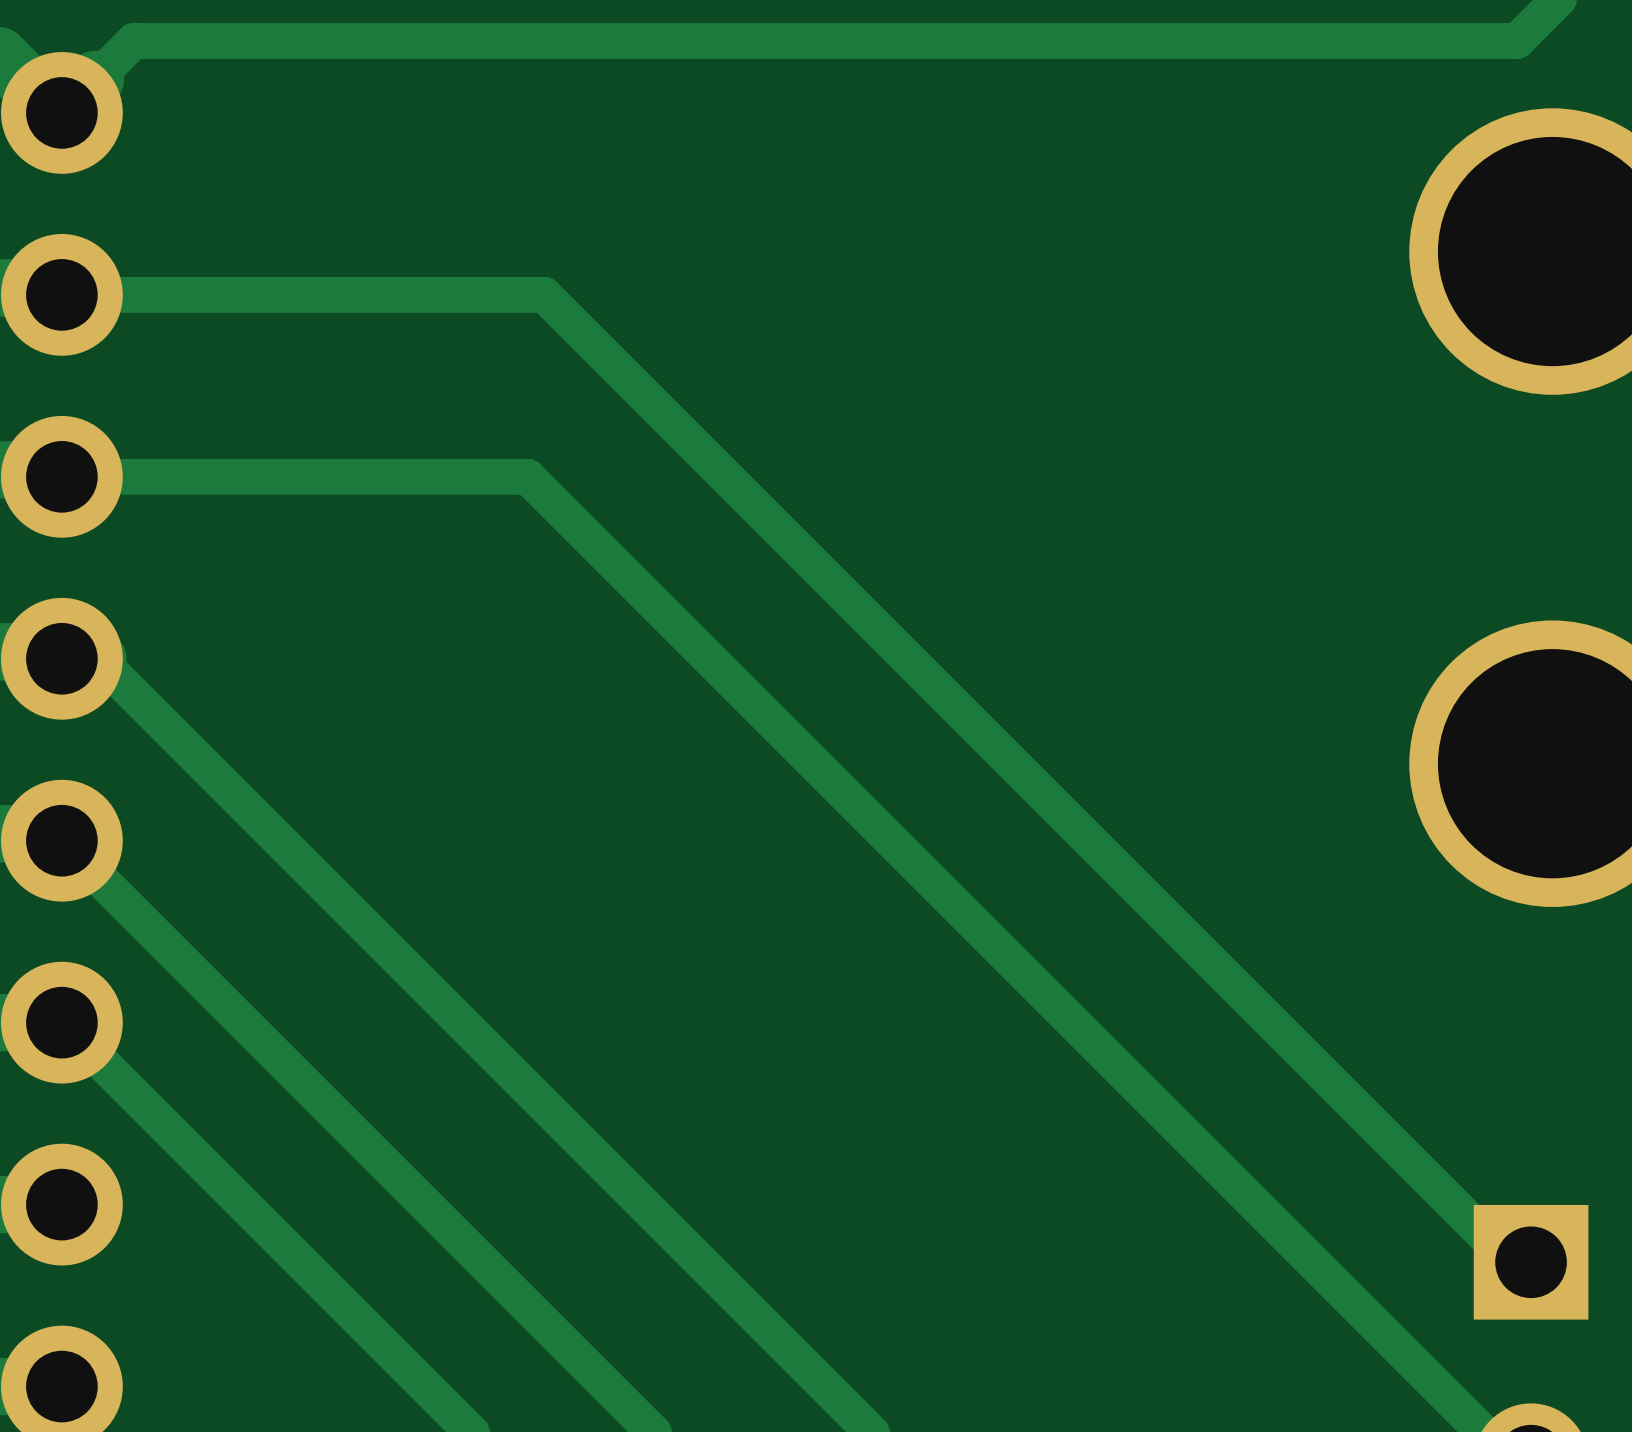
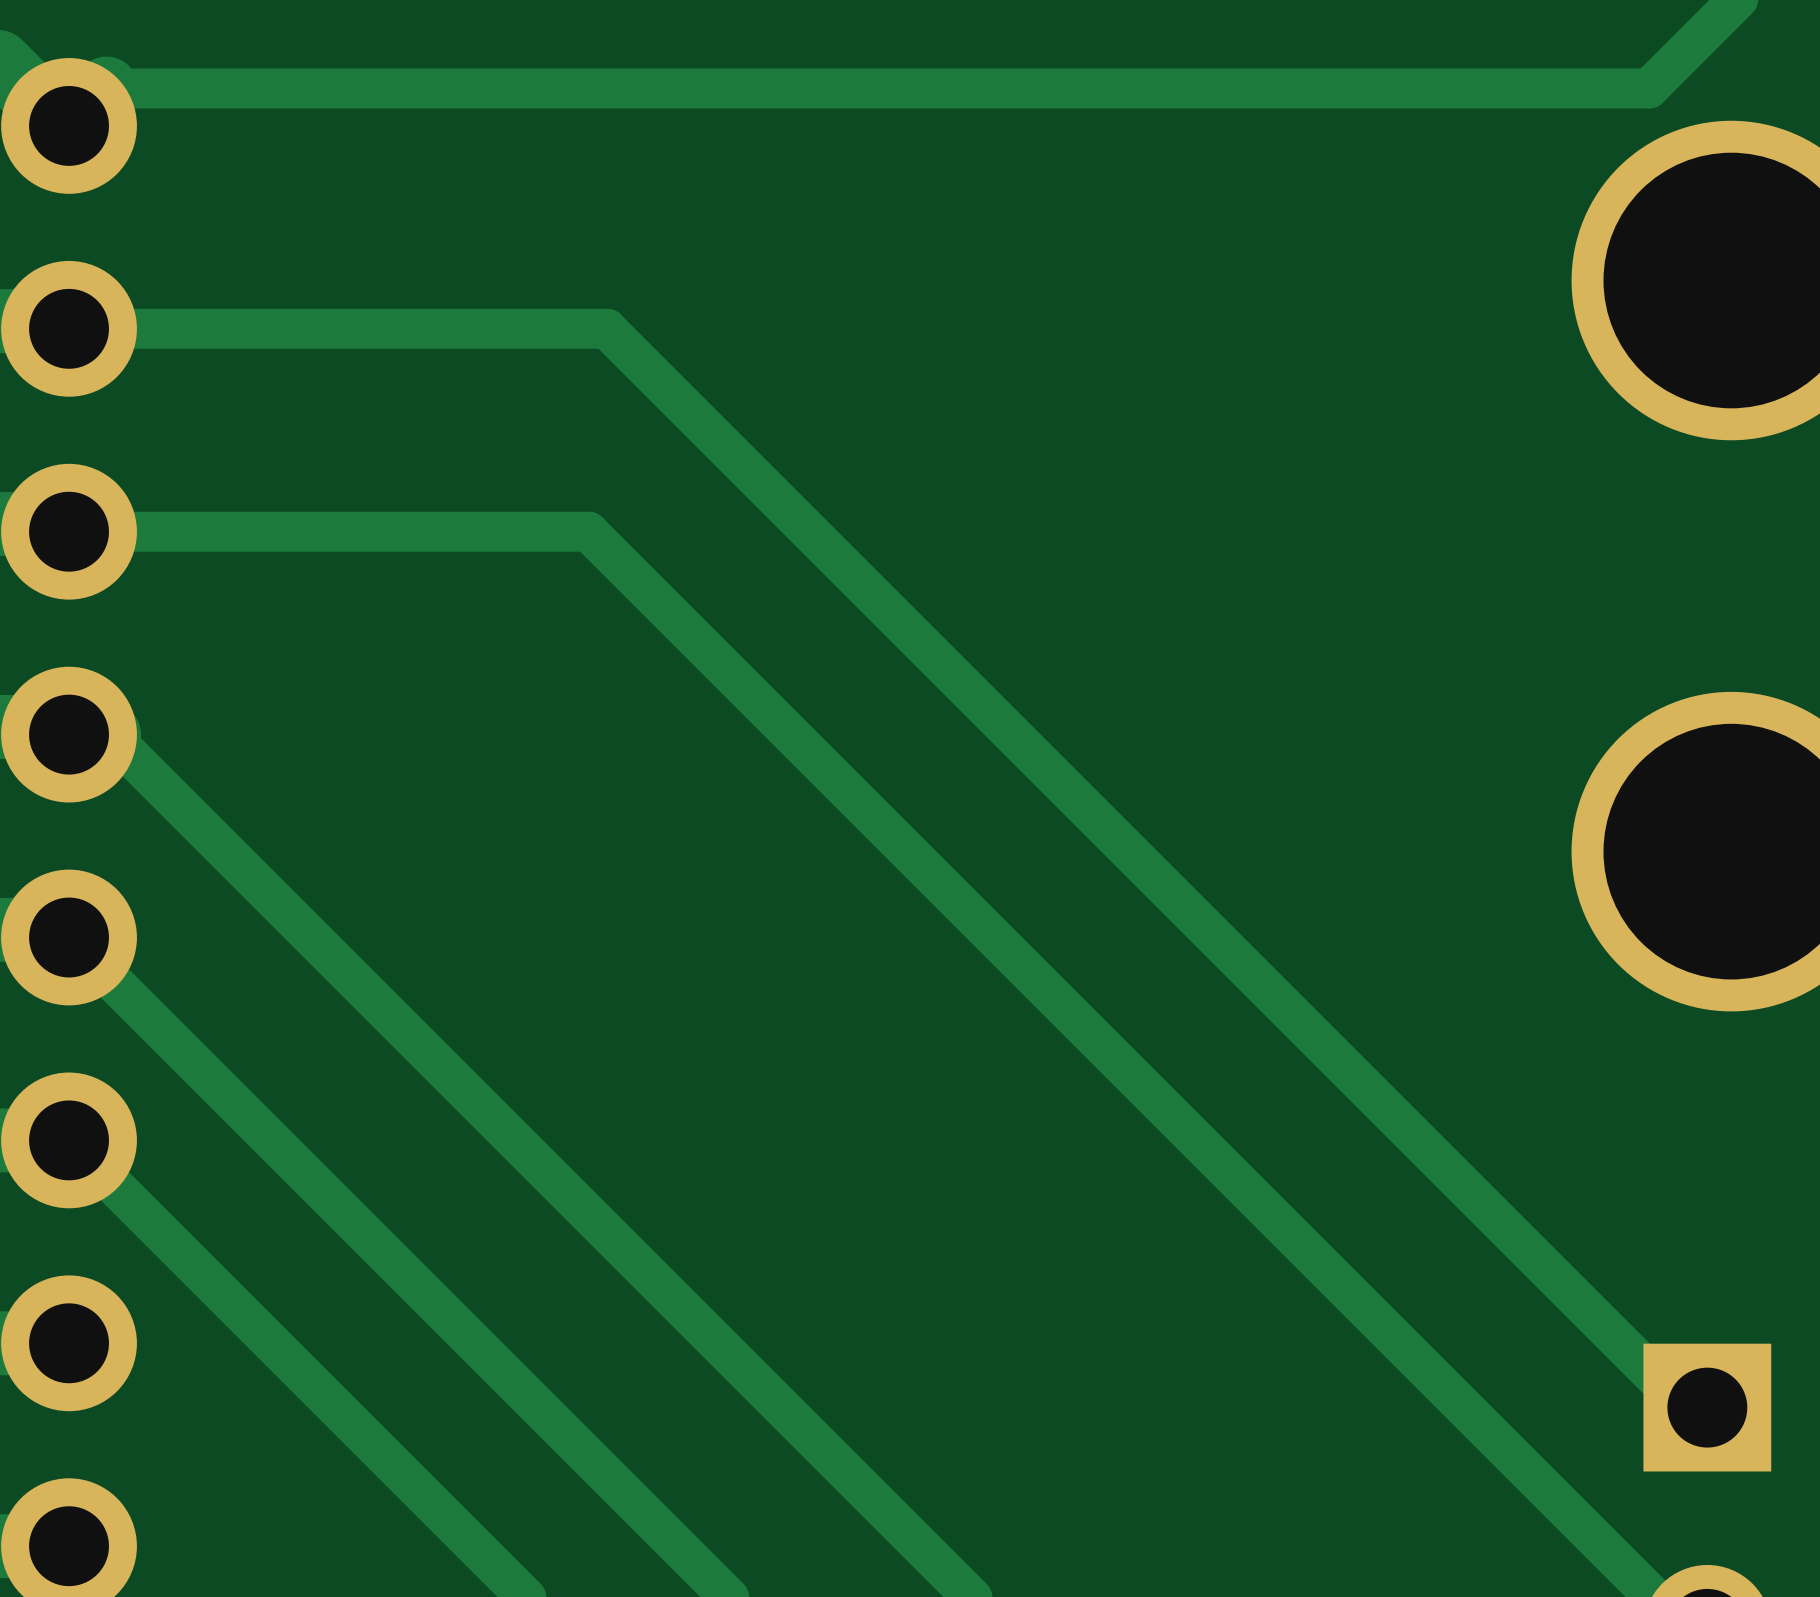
track: (1517, 40) (133, 40) (95, 79) -> (1691, 45) (1648, 88) (106, 88)

